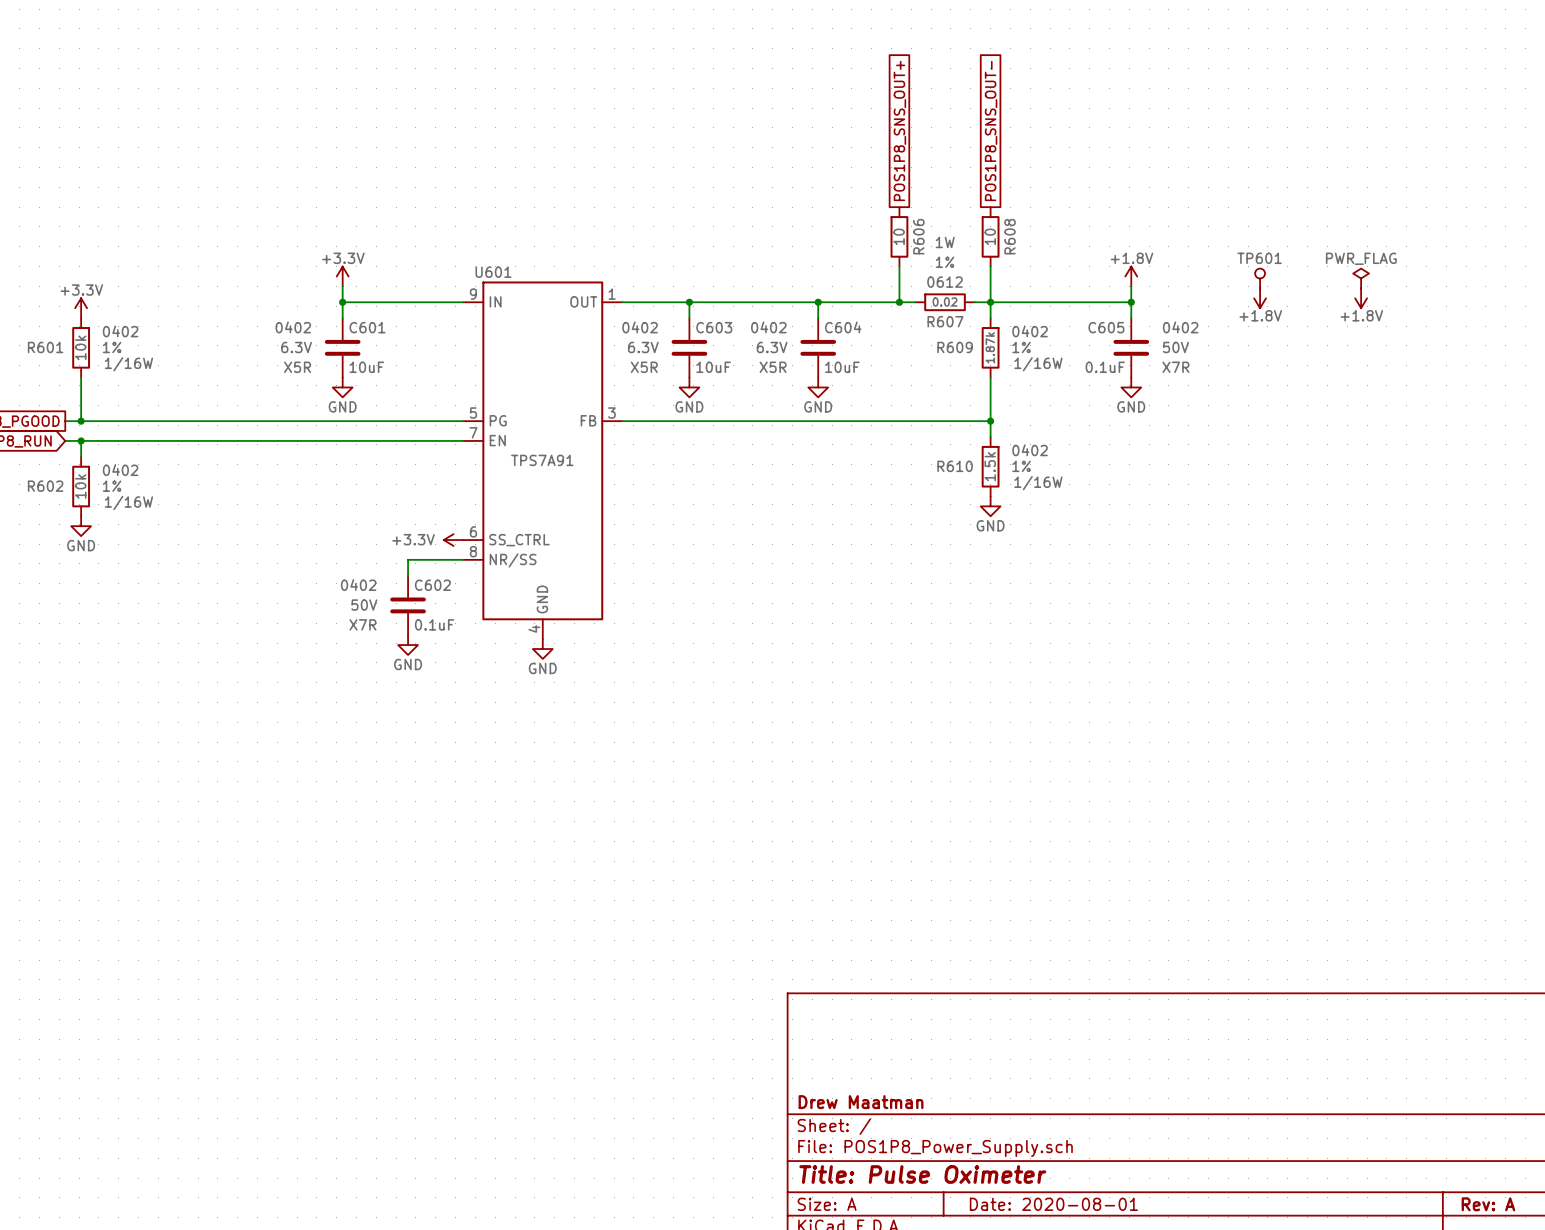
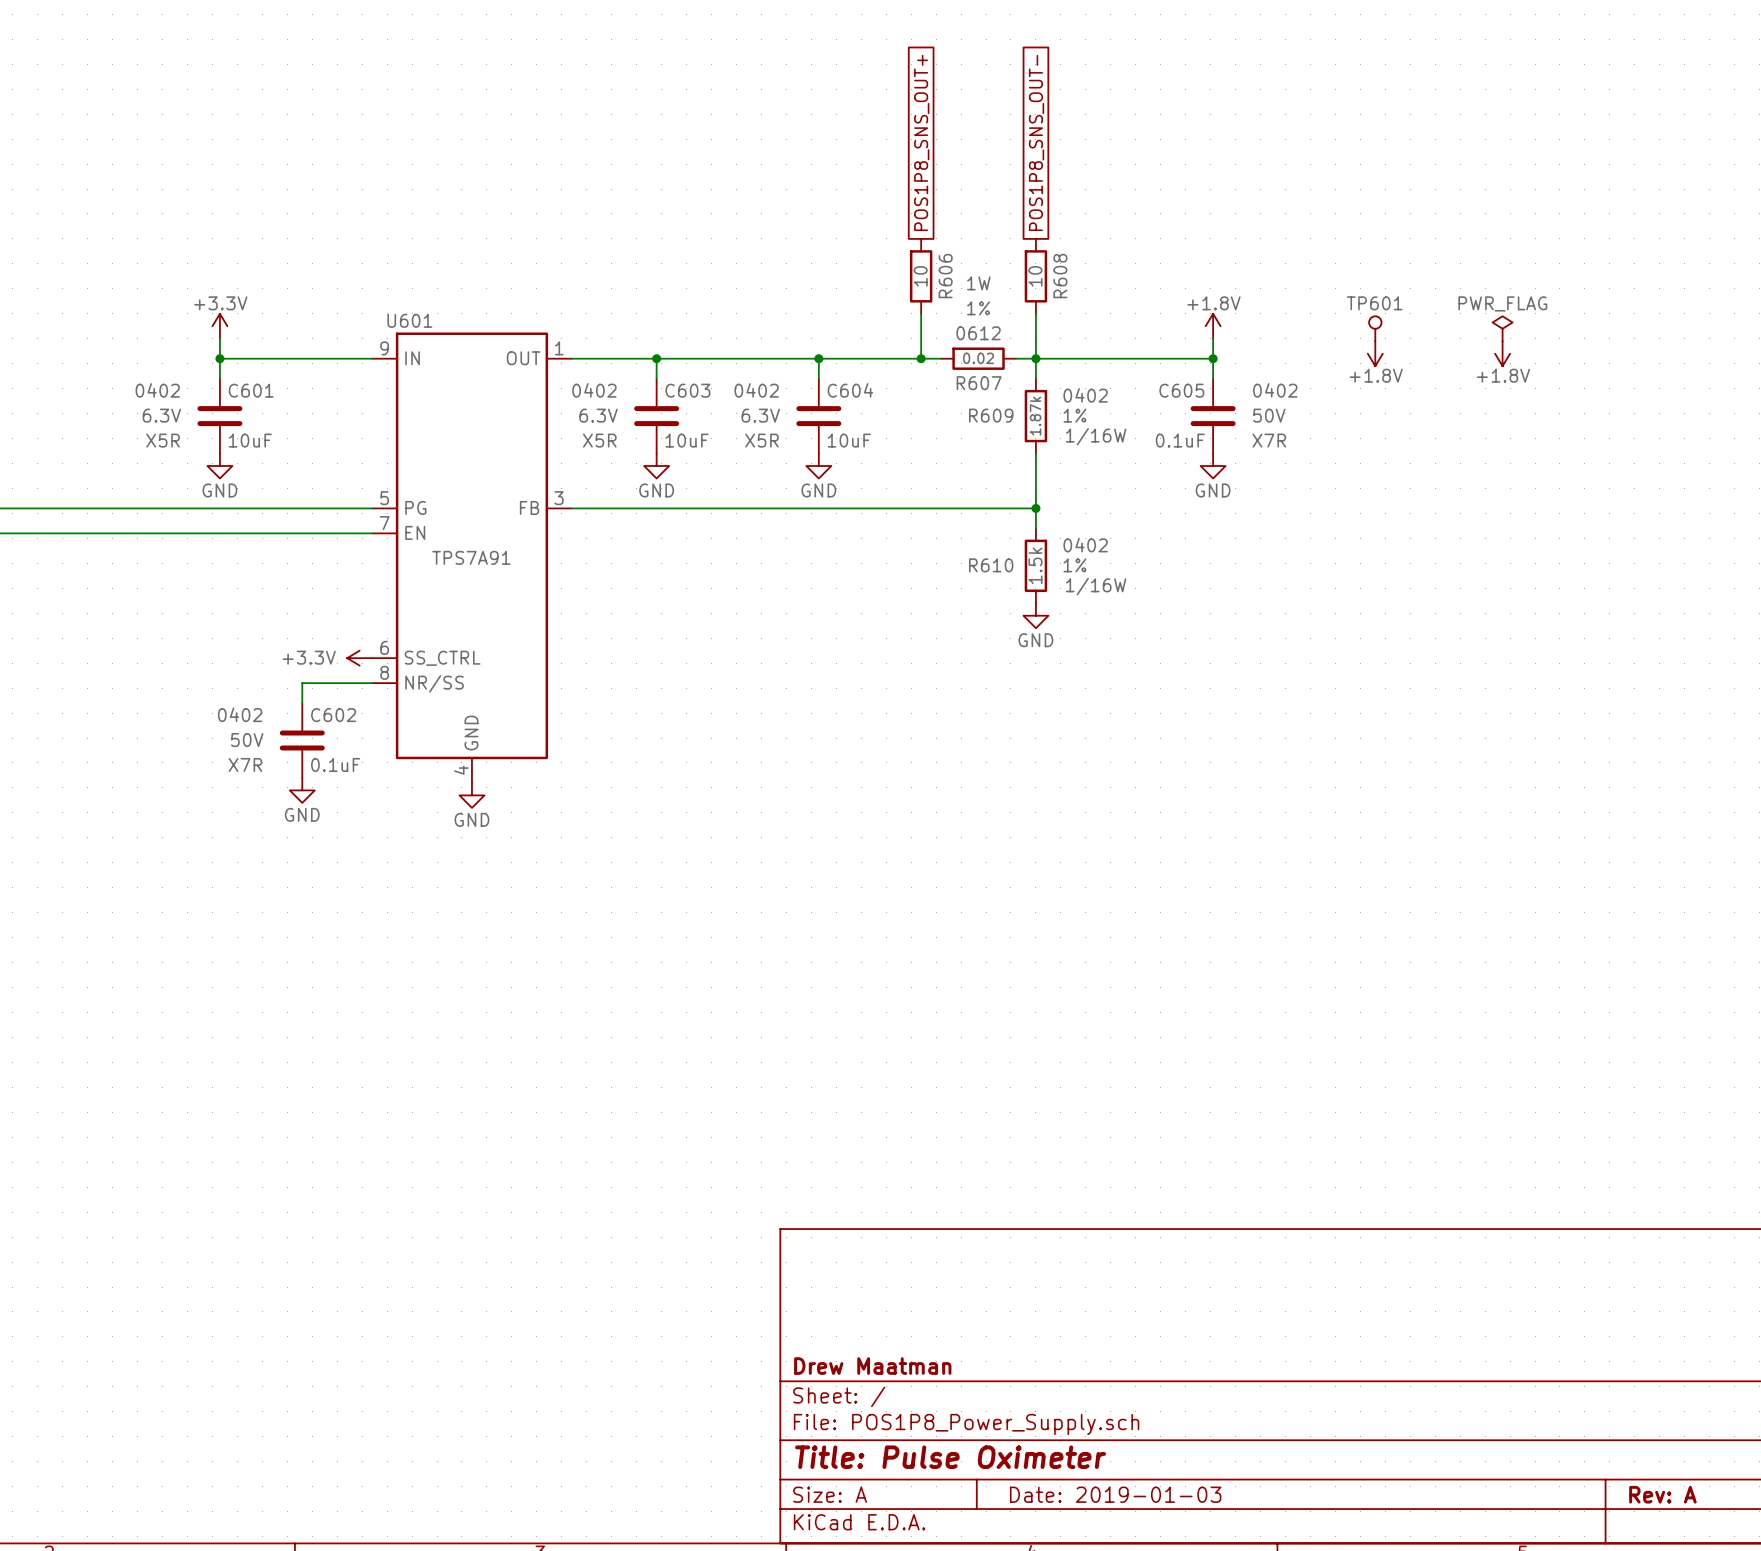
title block: Date: 2020-08-01 (1053, 1204) -> Date: 2019-01-03 (1115, 1494)

